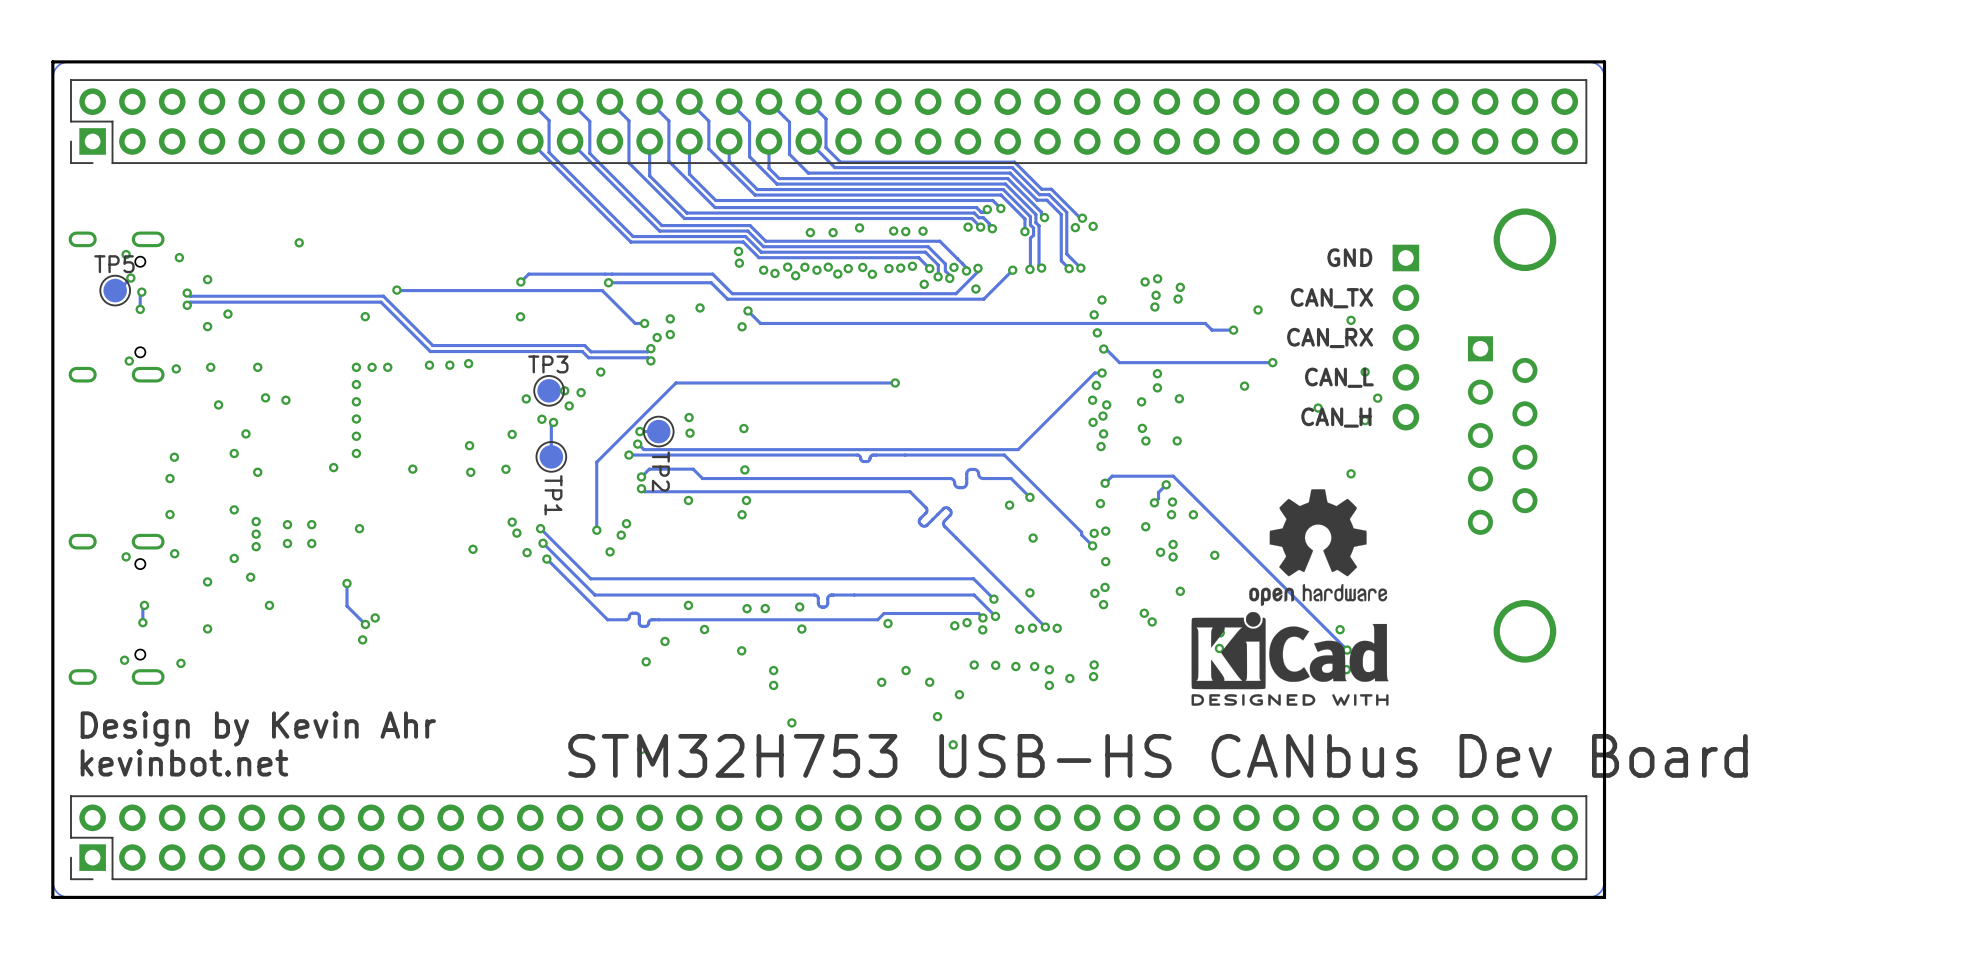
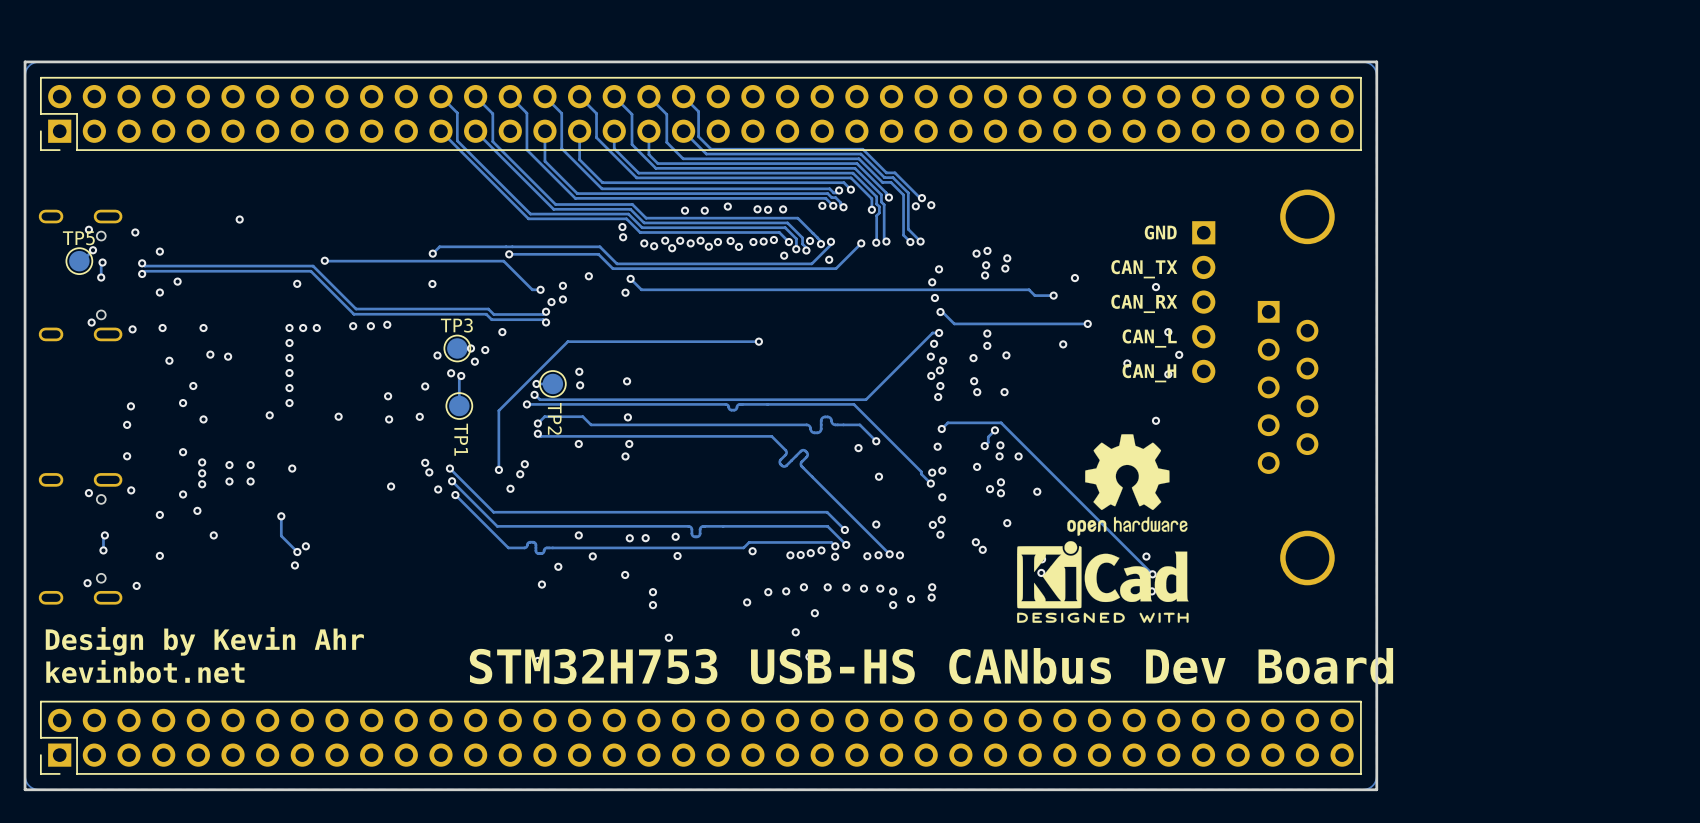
via: none -> (800, 555)
via: none -> (790, 555)
via: none -> (803, 587)
via: none -> (786, 591)
via: (929, 682) -> none

